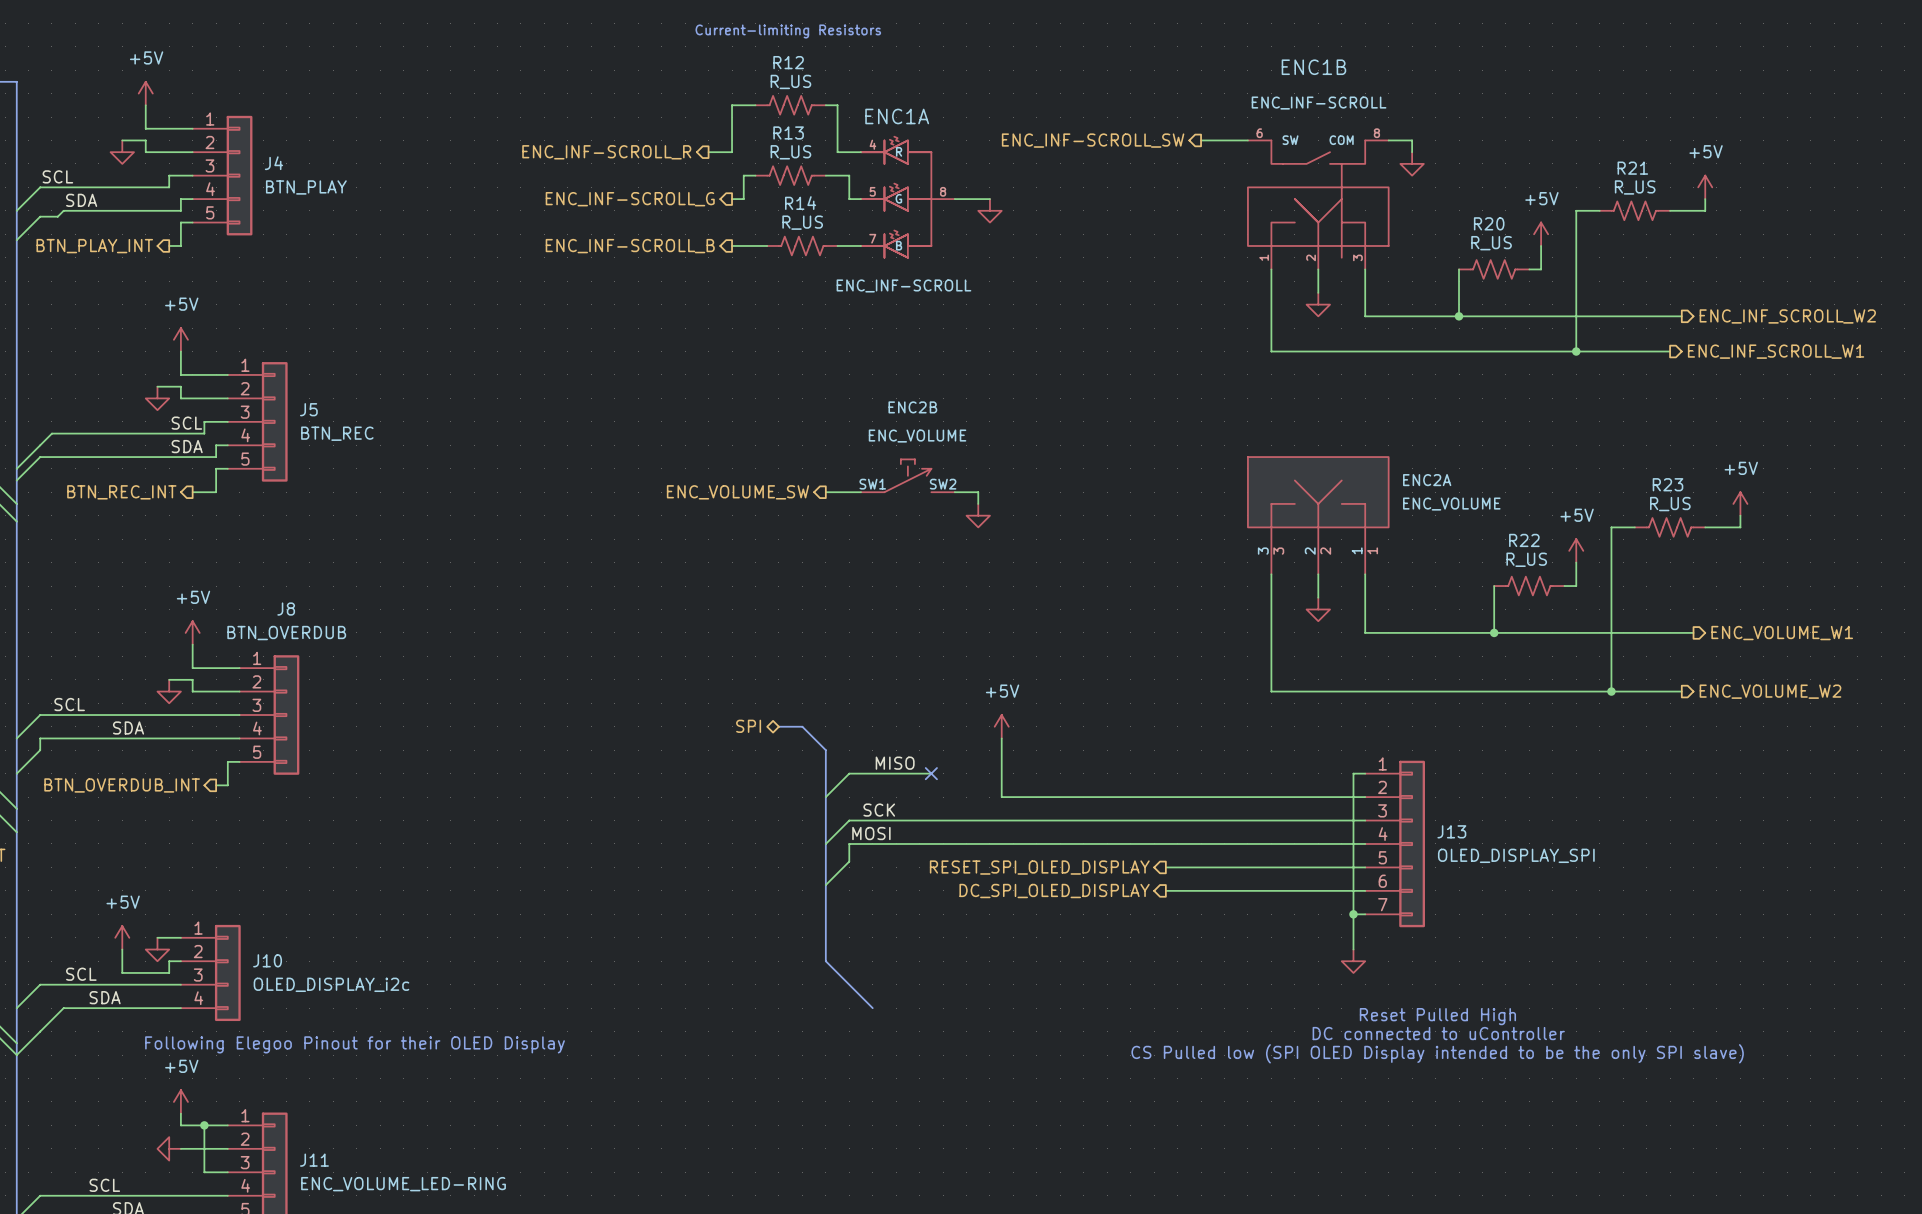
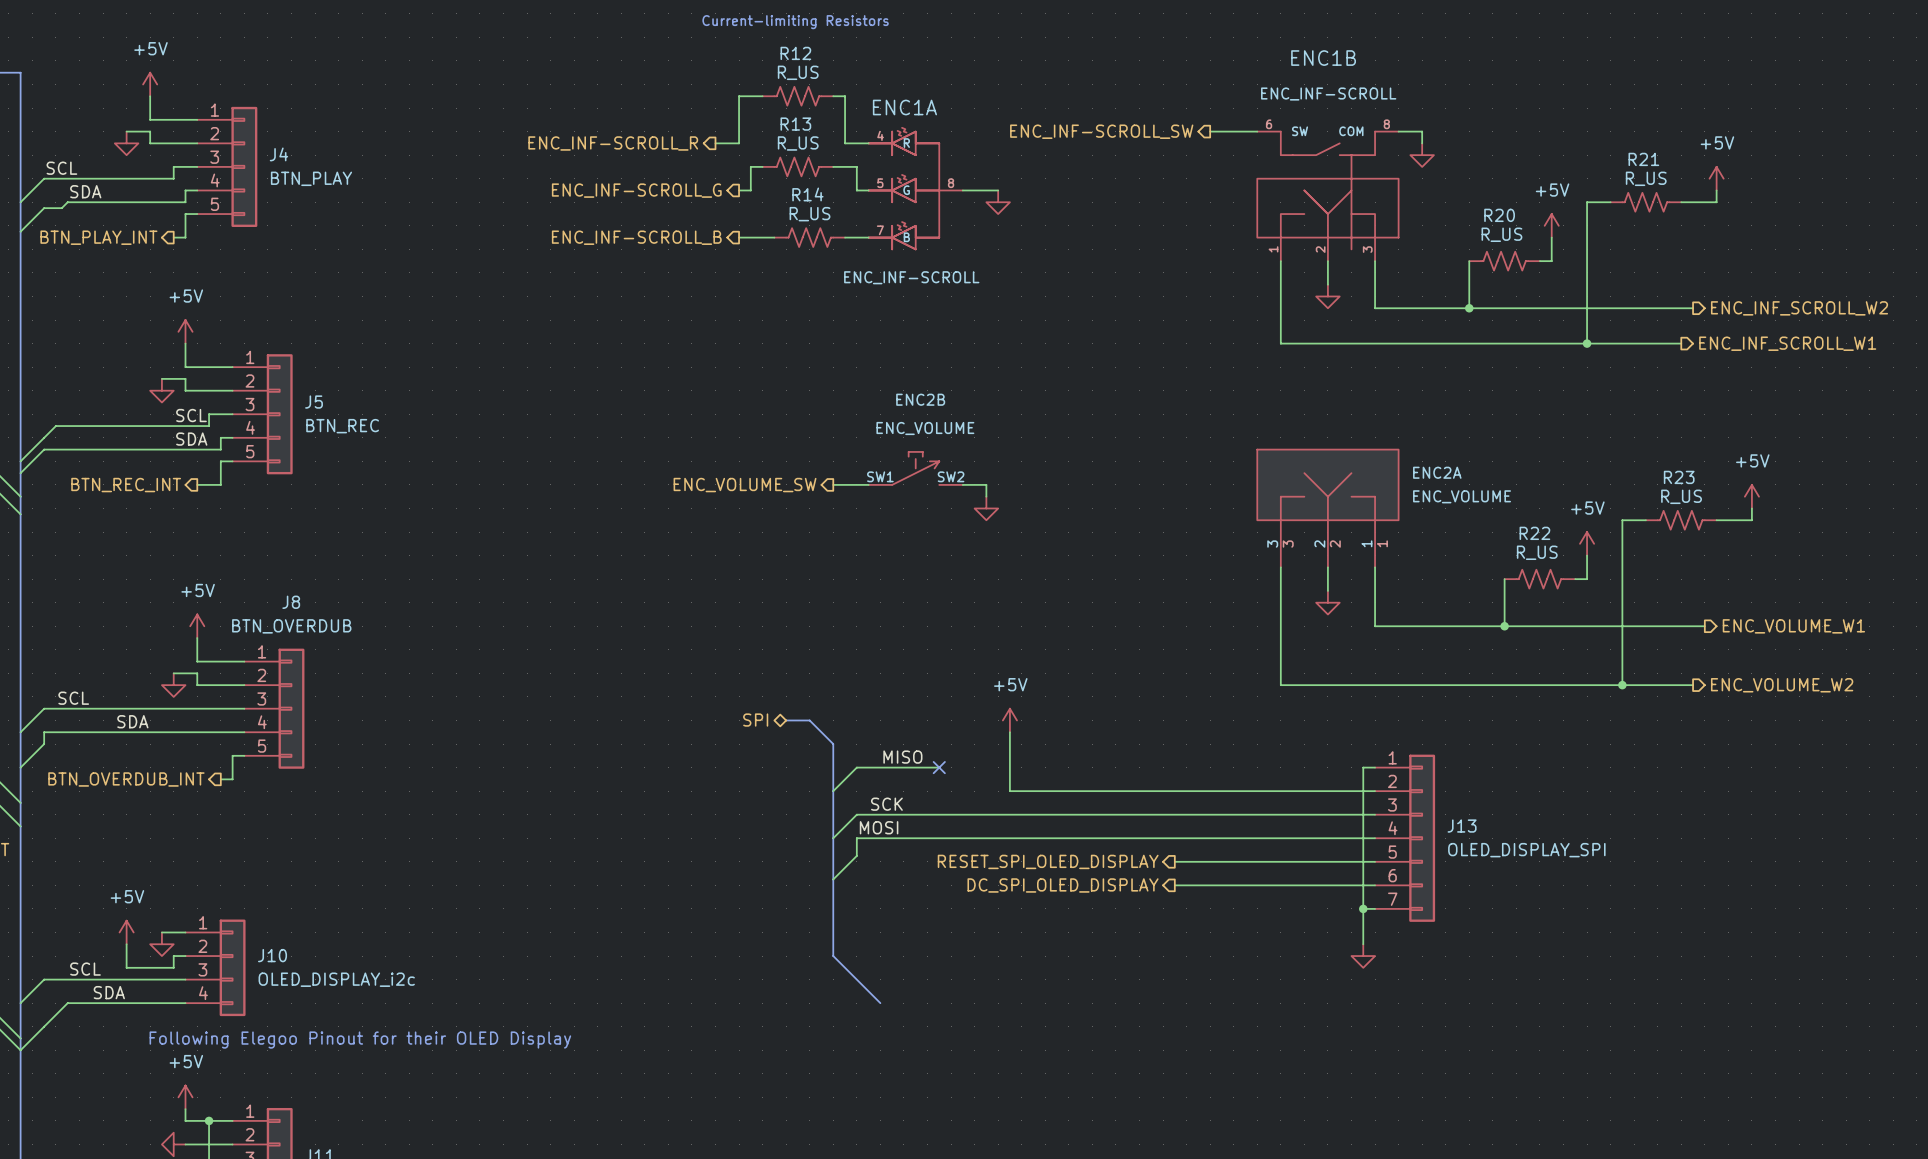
text: Reset Pulled High (1437, 1016) -> none
text: DC connected to uController (1438, 1033) -> none
text: CS Pulled low (SPI OLED Display intended to be the only SPI slave) (1437, 1053) -> none

